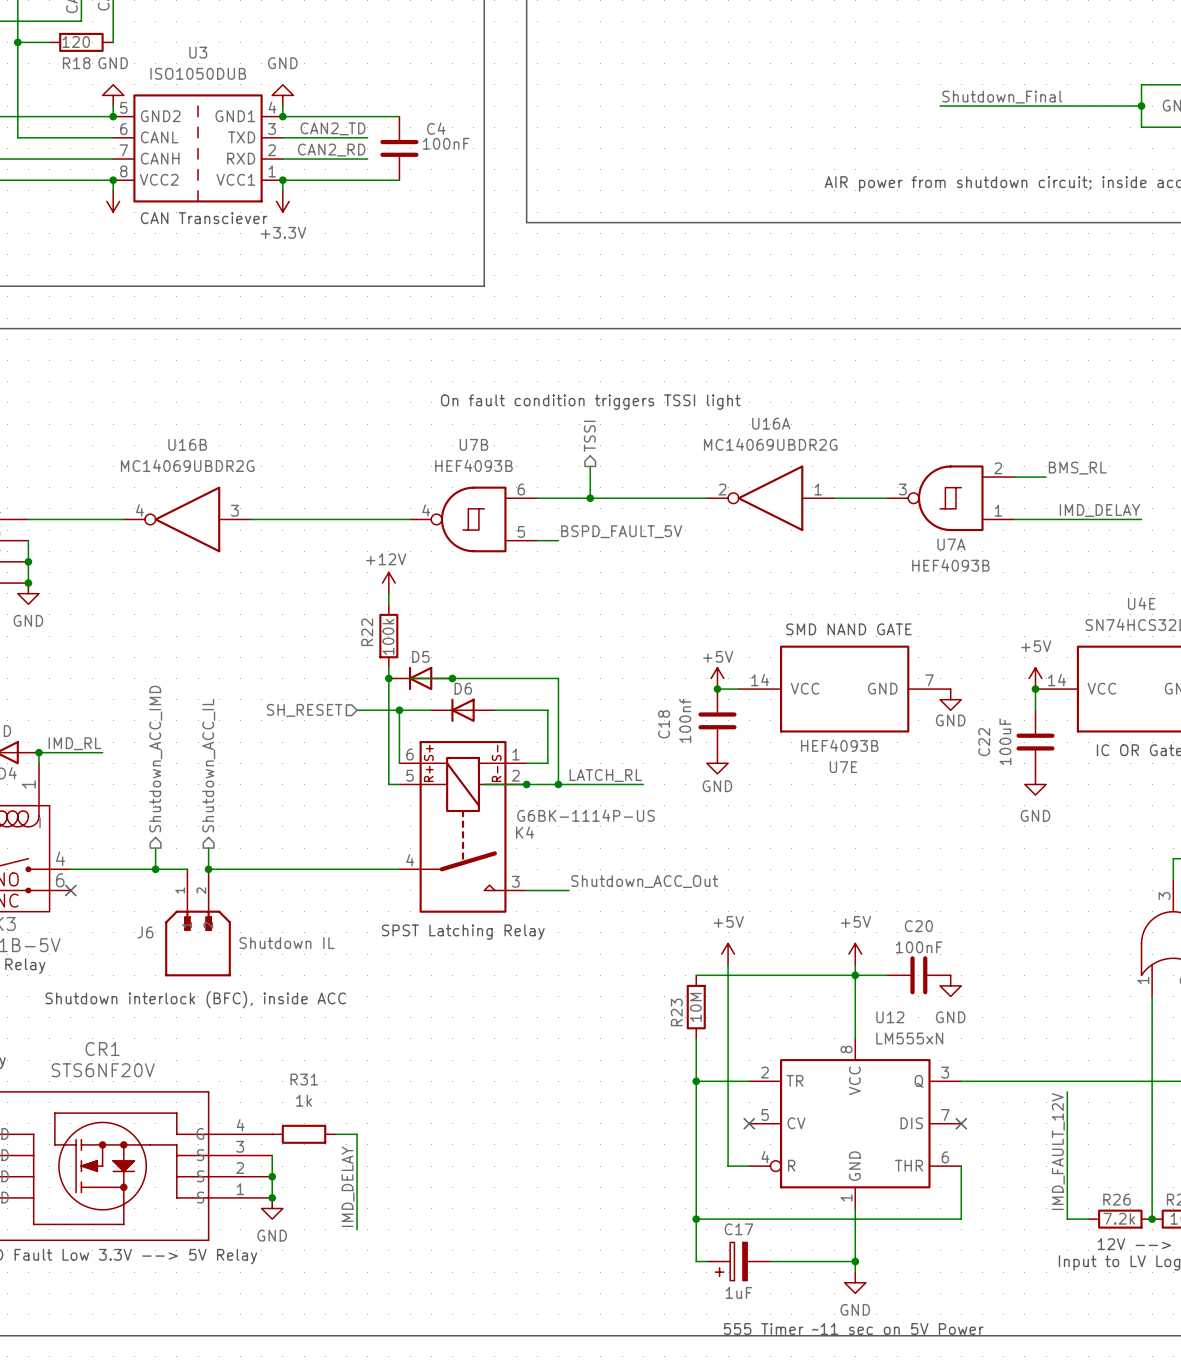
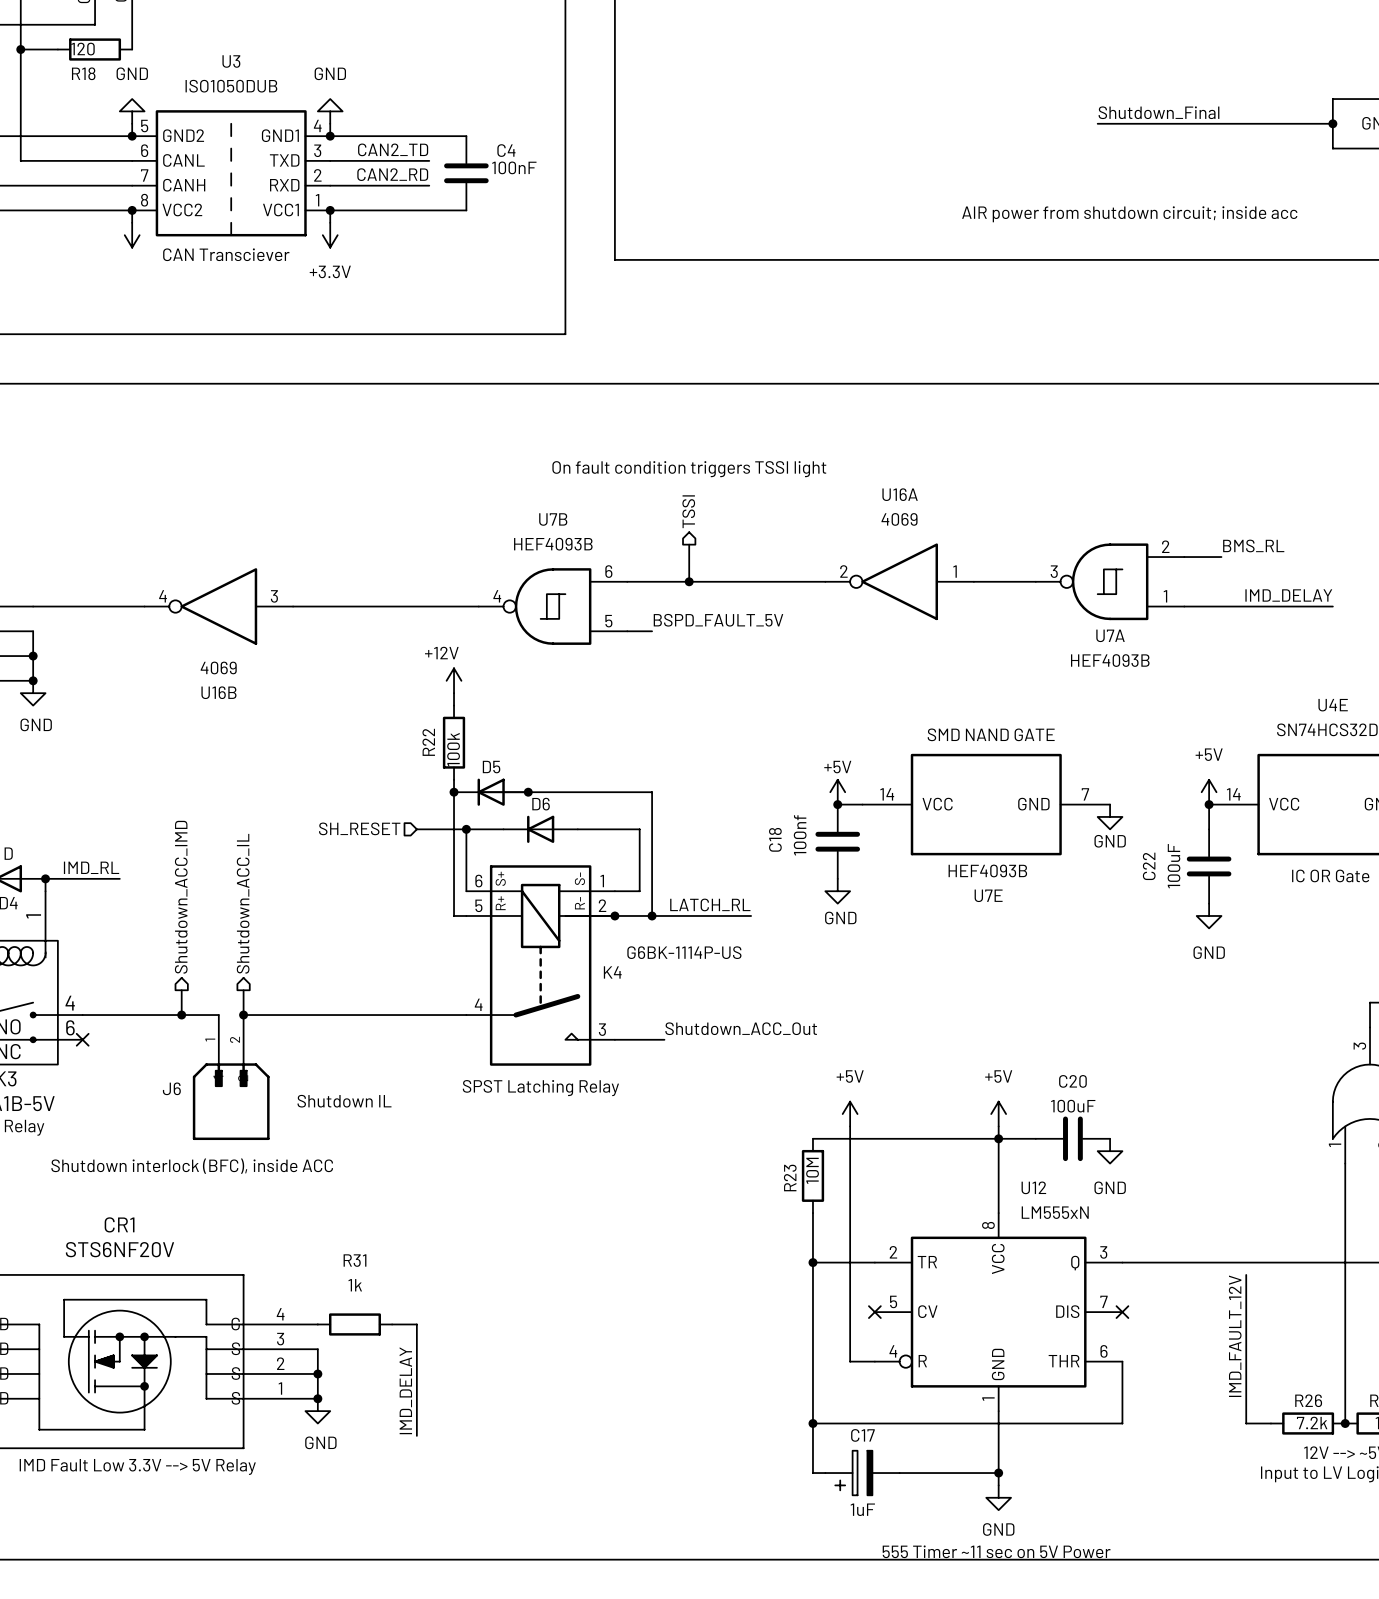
U16B name position: U16B (187, 444) -> U16B (218, 692)
U16A value: MC14069UBDR2G (770, 444) -> 4069 (899, 519)
U16B value: MC14069UBDR2G (187, 465) -> 4069 (218, 667)
C20 value: 100nF (919, 947) -> 100uF (1073, 1106)

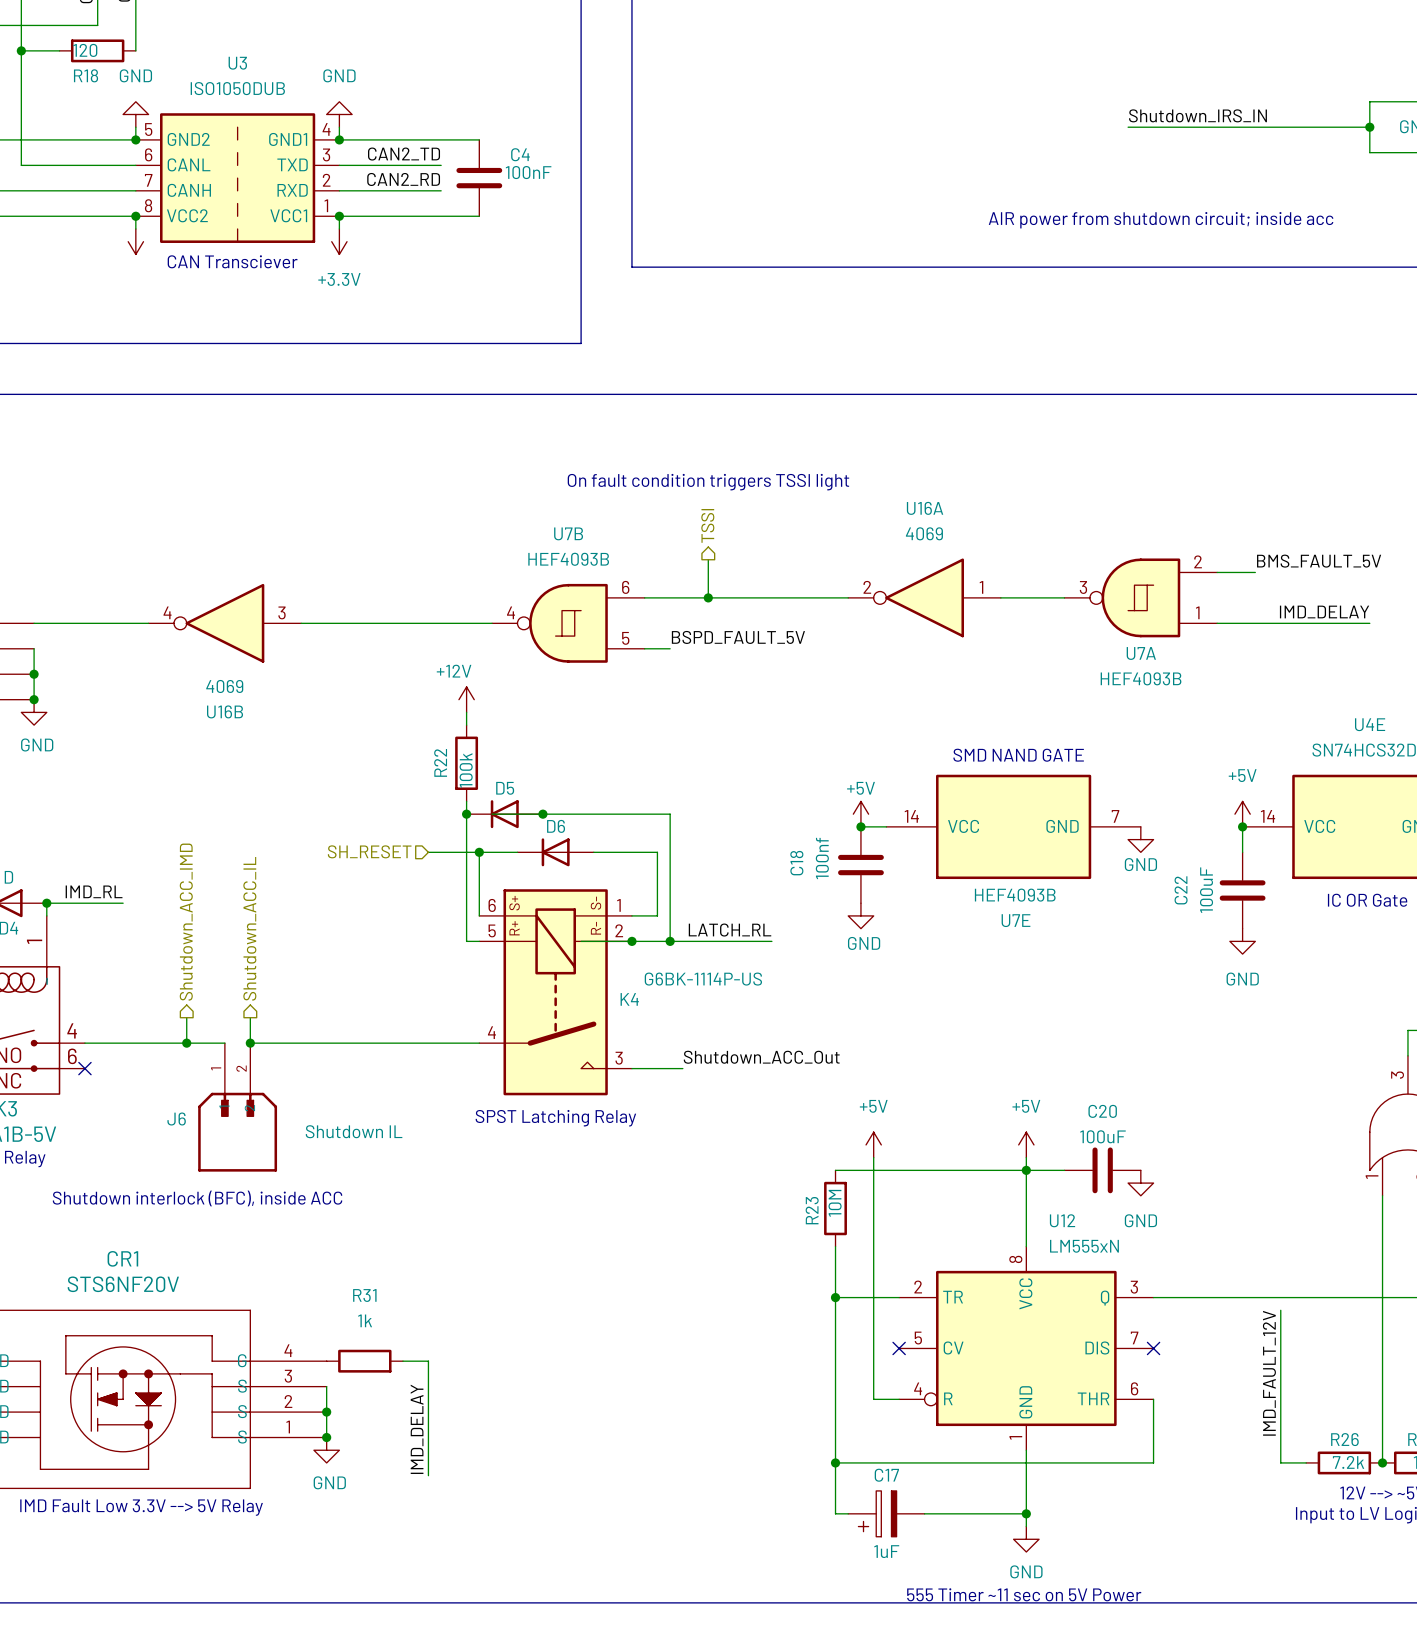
label: Shutdown_Final (1158, 112) -> Shutdown_IRS_IN (1197, 115)
label: BMS_RL (1253, 545) -> BMS_FAULT_5V (1319, 561)

